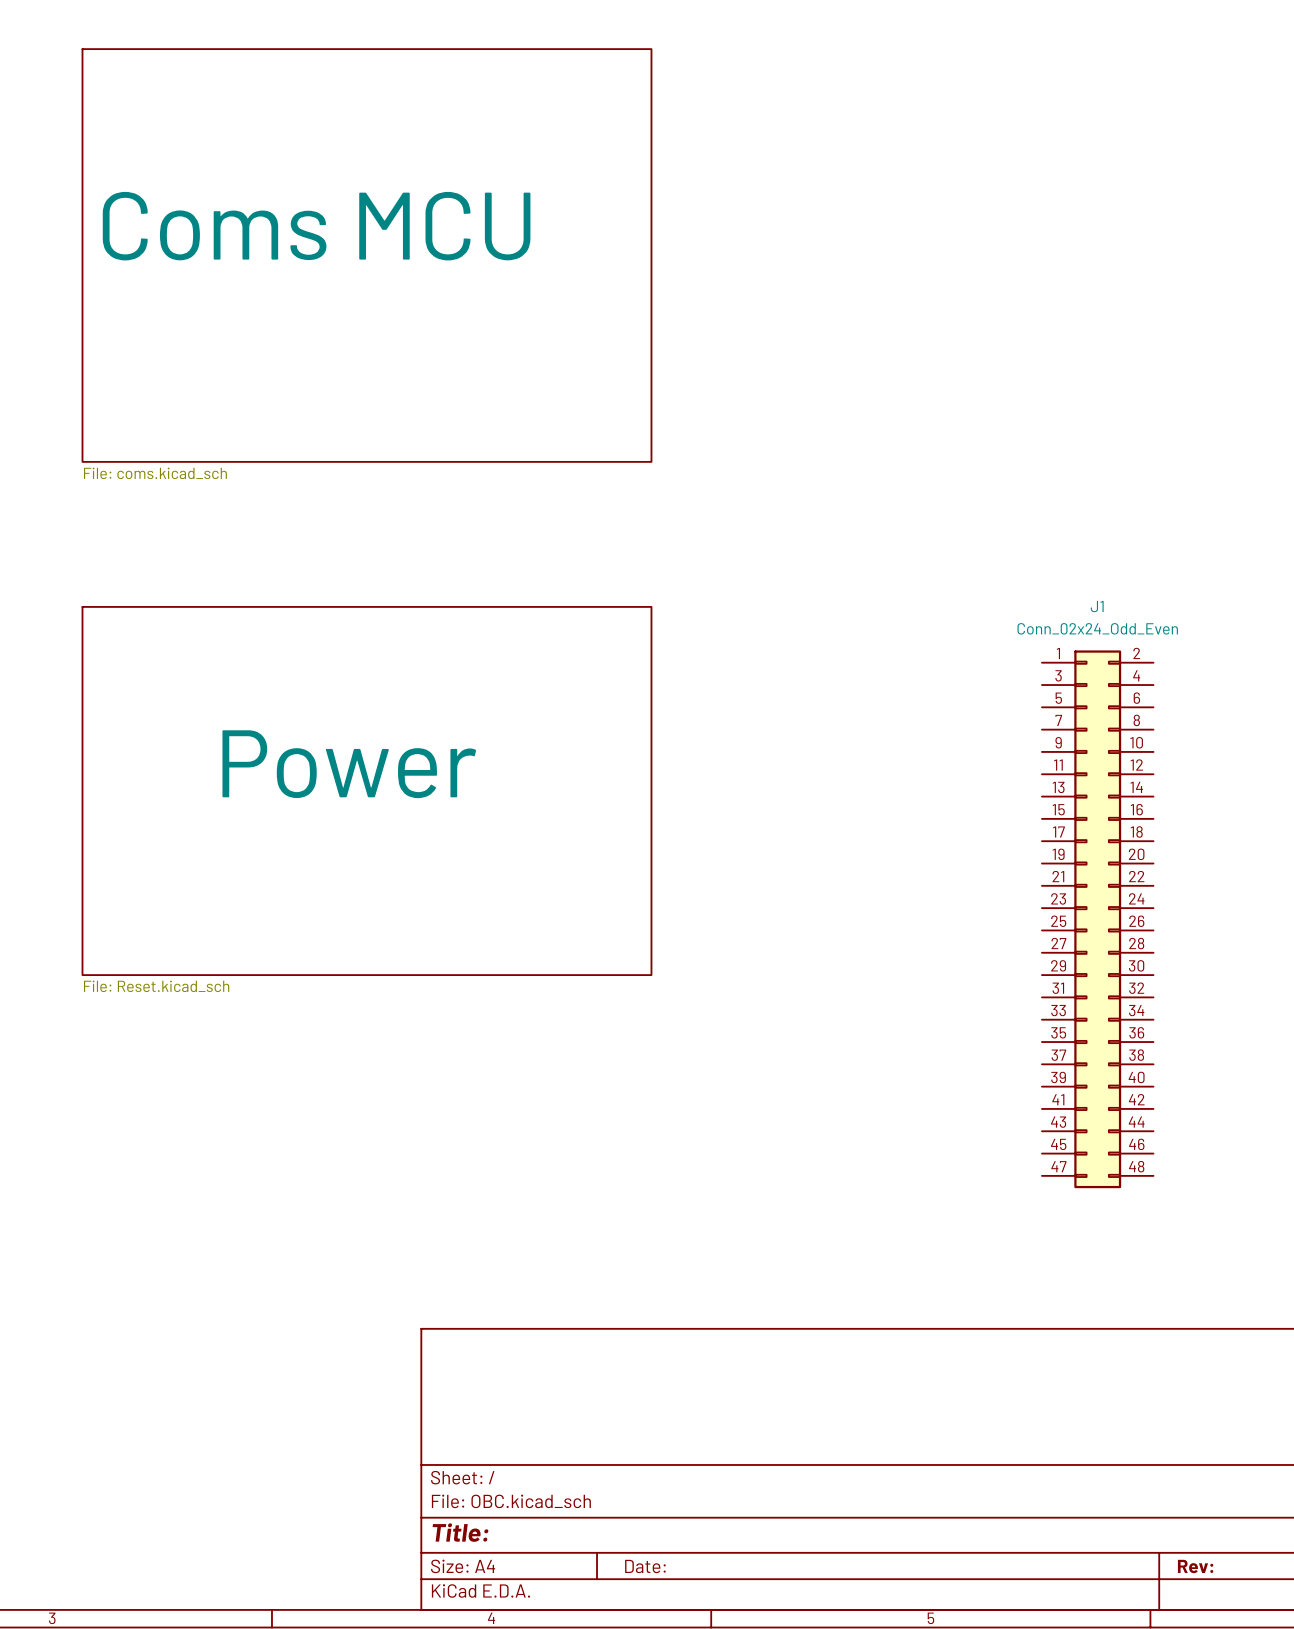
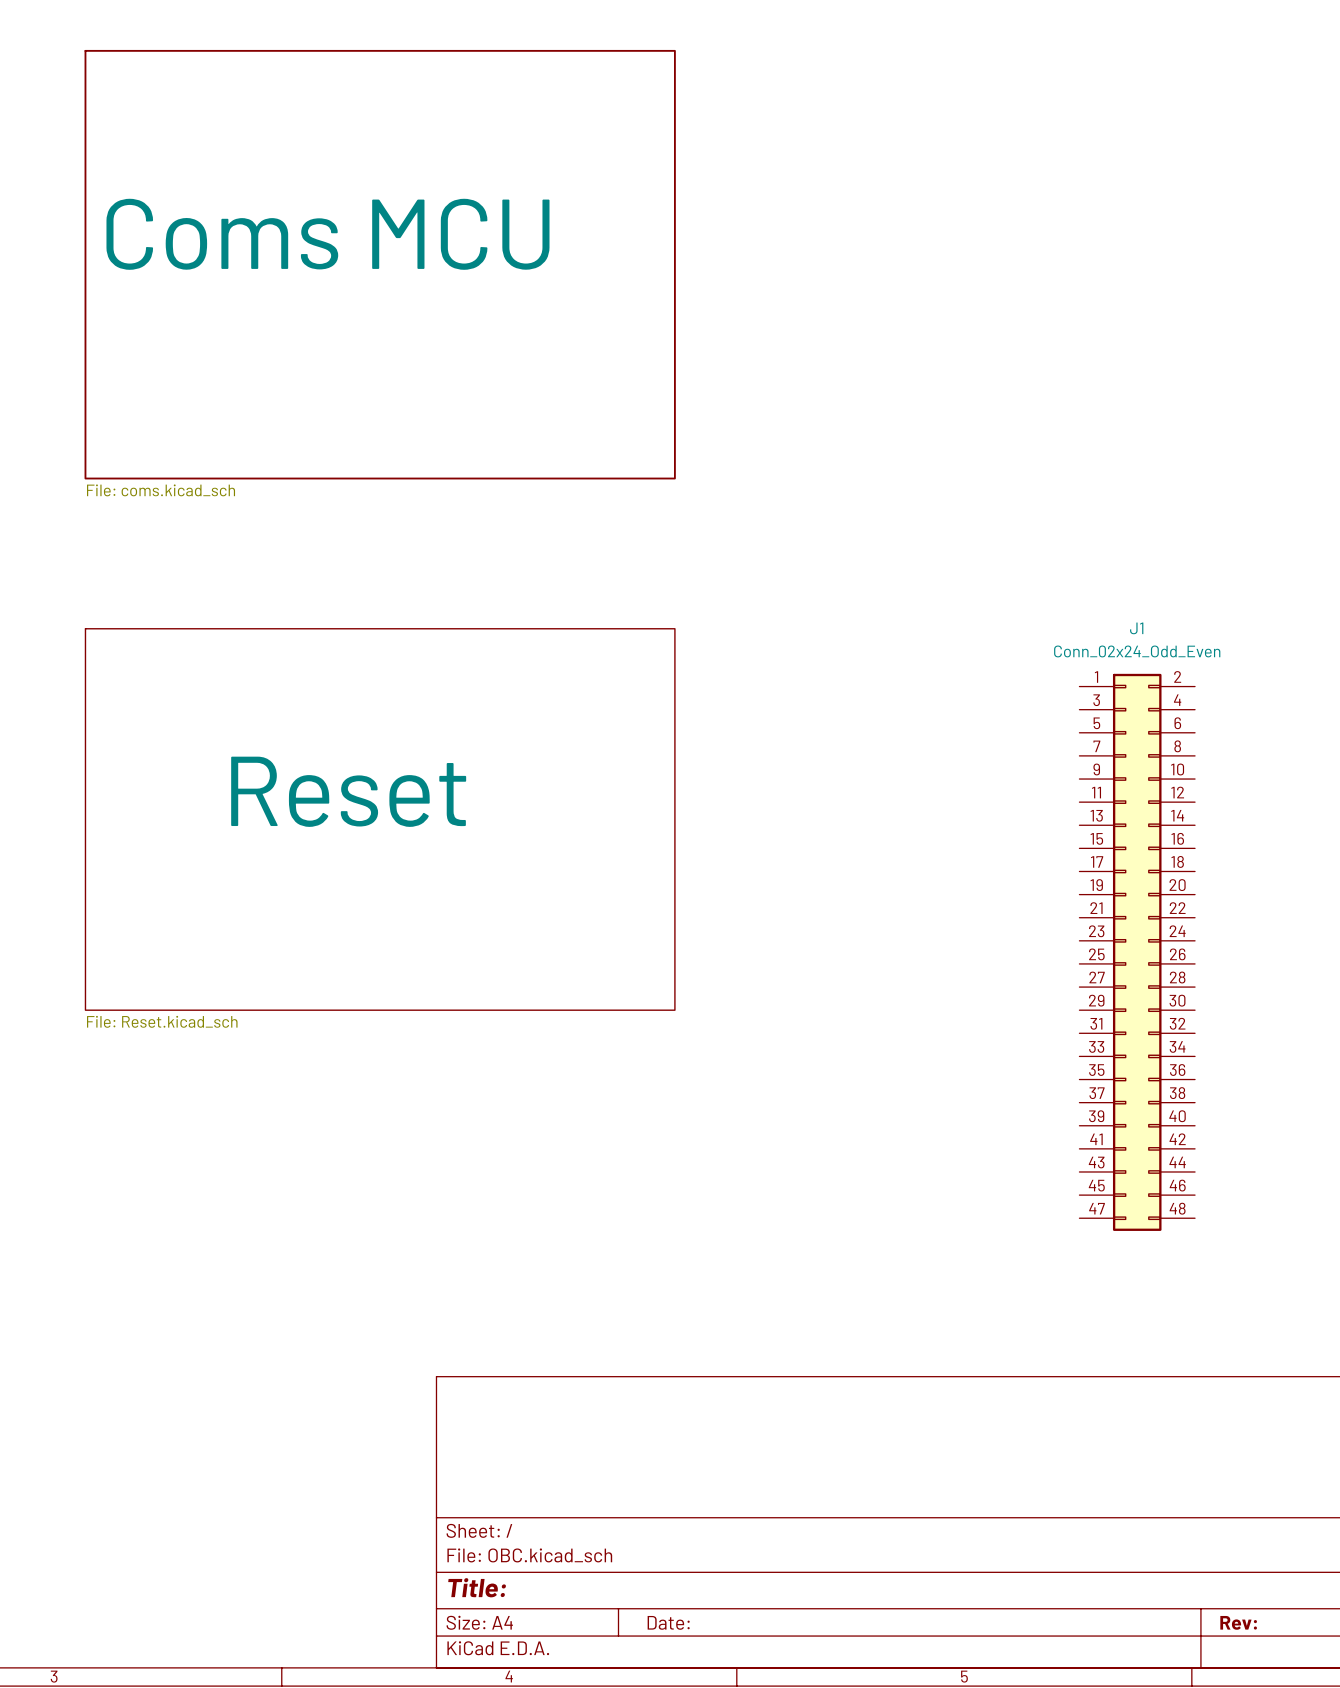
sheet Power name: Power (349, 764) -> Reset (348, 791)

